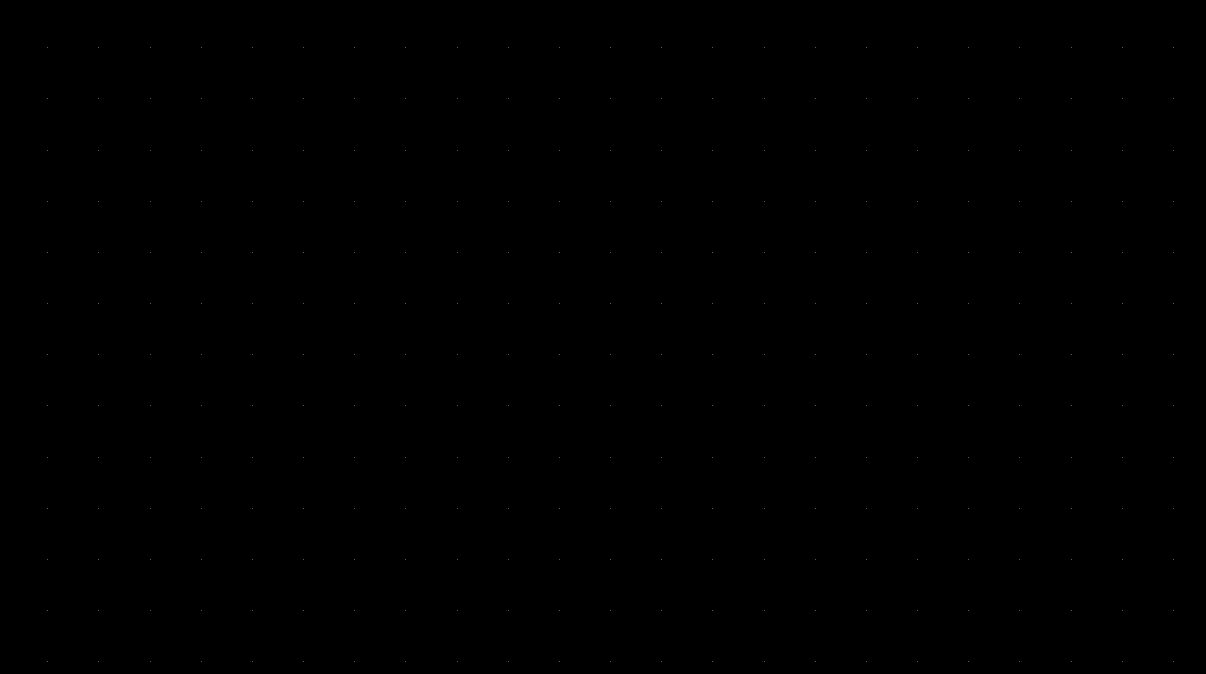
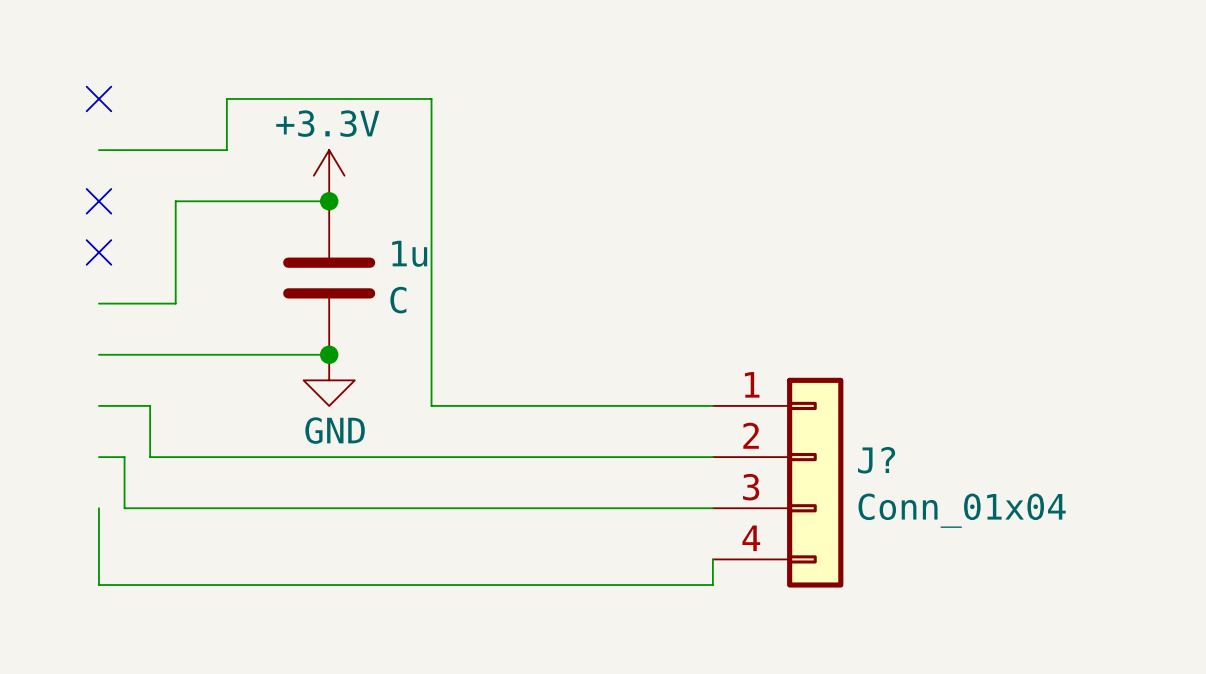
no-connect mark: none -> (98, 98)
wire: none -> (98, 150) (226, 150) (226, 98) (431, 98) (431, 405) (712, 405)
power symbol: none -> +3.3V (329, 175)
no-connect mark: none -> (98, 201)
wire: none -> (329, 201) (175, 201) (175, 303) (98, 303)
junction: none -> (329, 201)
no-connect mark: none -> (98, 252)
1u: none -> C (329, 278)
wire: none -> (98, 354) (329, 354)
junction: none -> (329, 354)
power symbol: none -> GND (329, 380)
wire: none -> (98, 405) (150, 405) (150, 457) (712, 457)
wire: none -> (98, 457) (124, 457) (124, 508) (712, 508)
J?: none -> Conn_01x04 (778, 482)
wire: none -> (98, 508) (98, 585) (712, 585) (712, 559)

